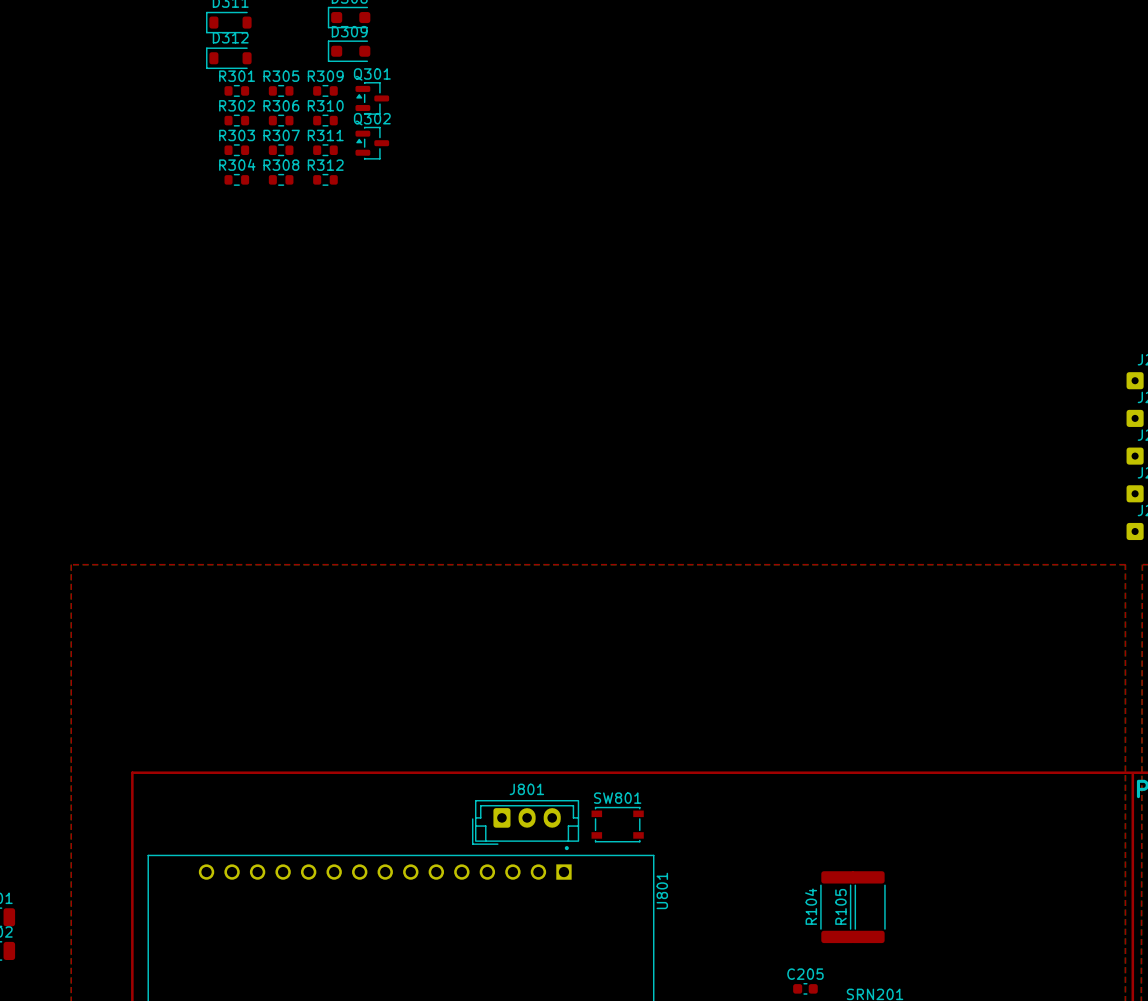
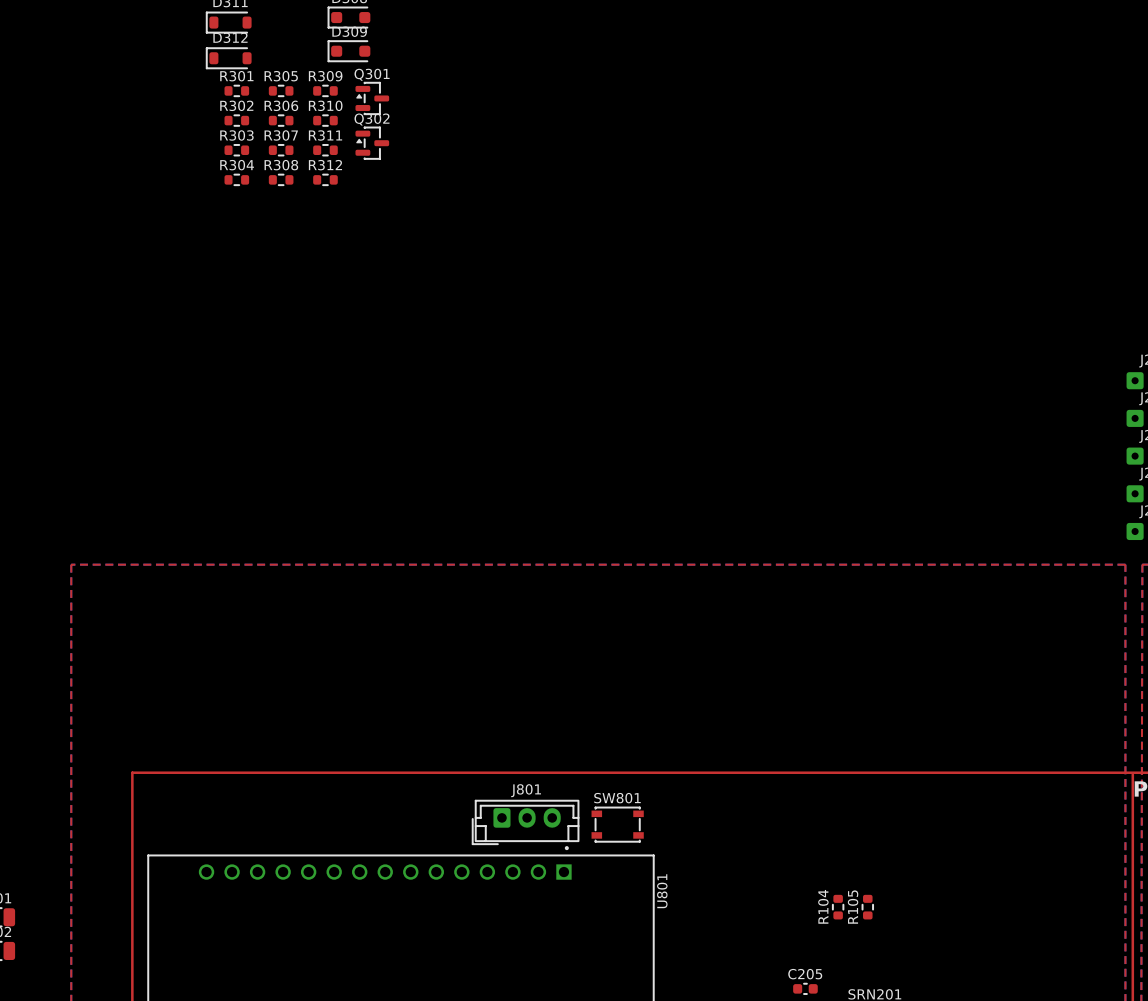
R104 footprint: [820, 871, 856, 944] -> [832, 894, 844, 920]
R105 footprint: [849, 871, 886, 944] -> [861, 894, 874, 920]

